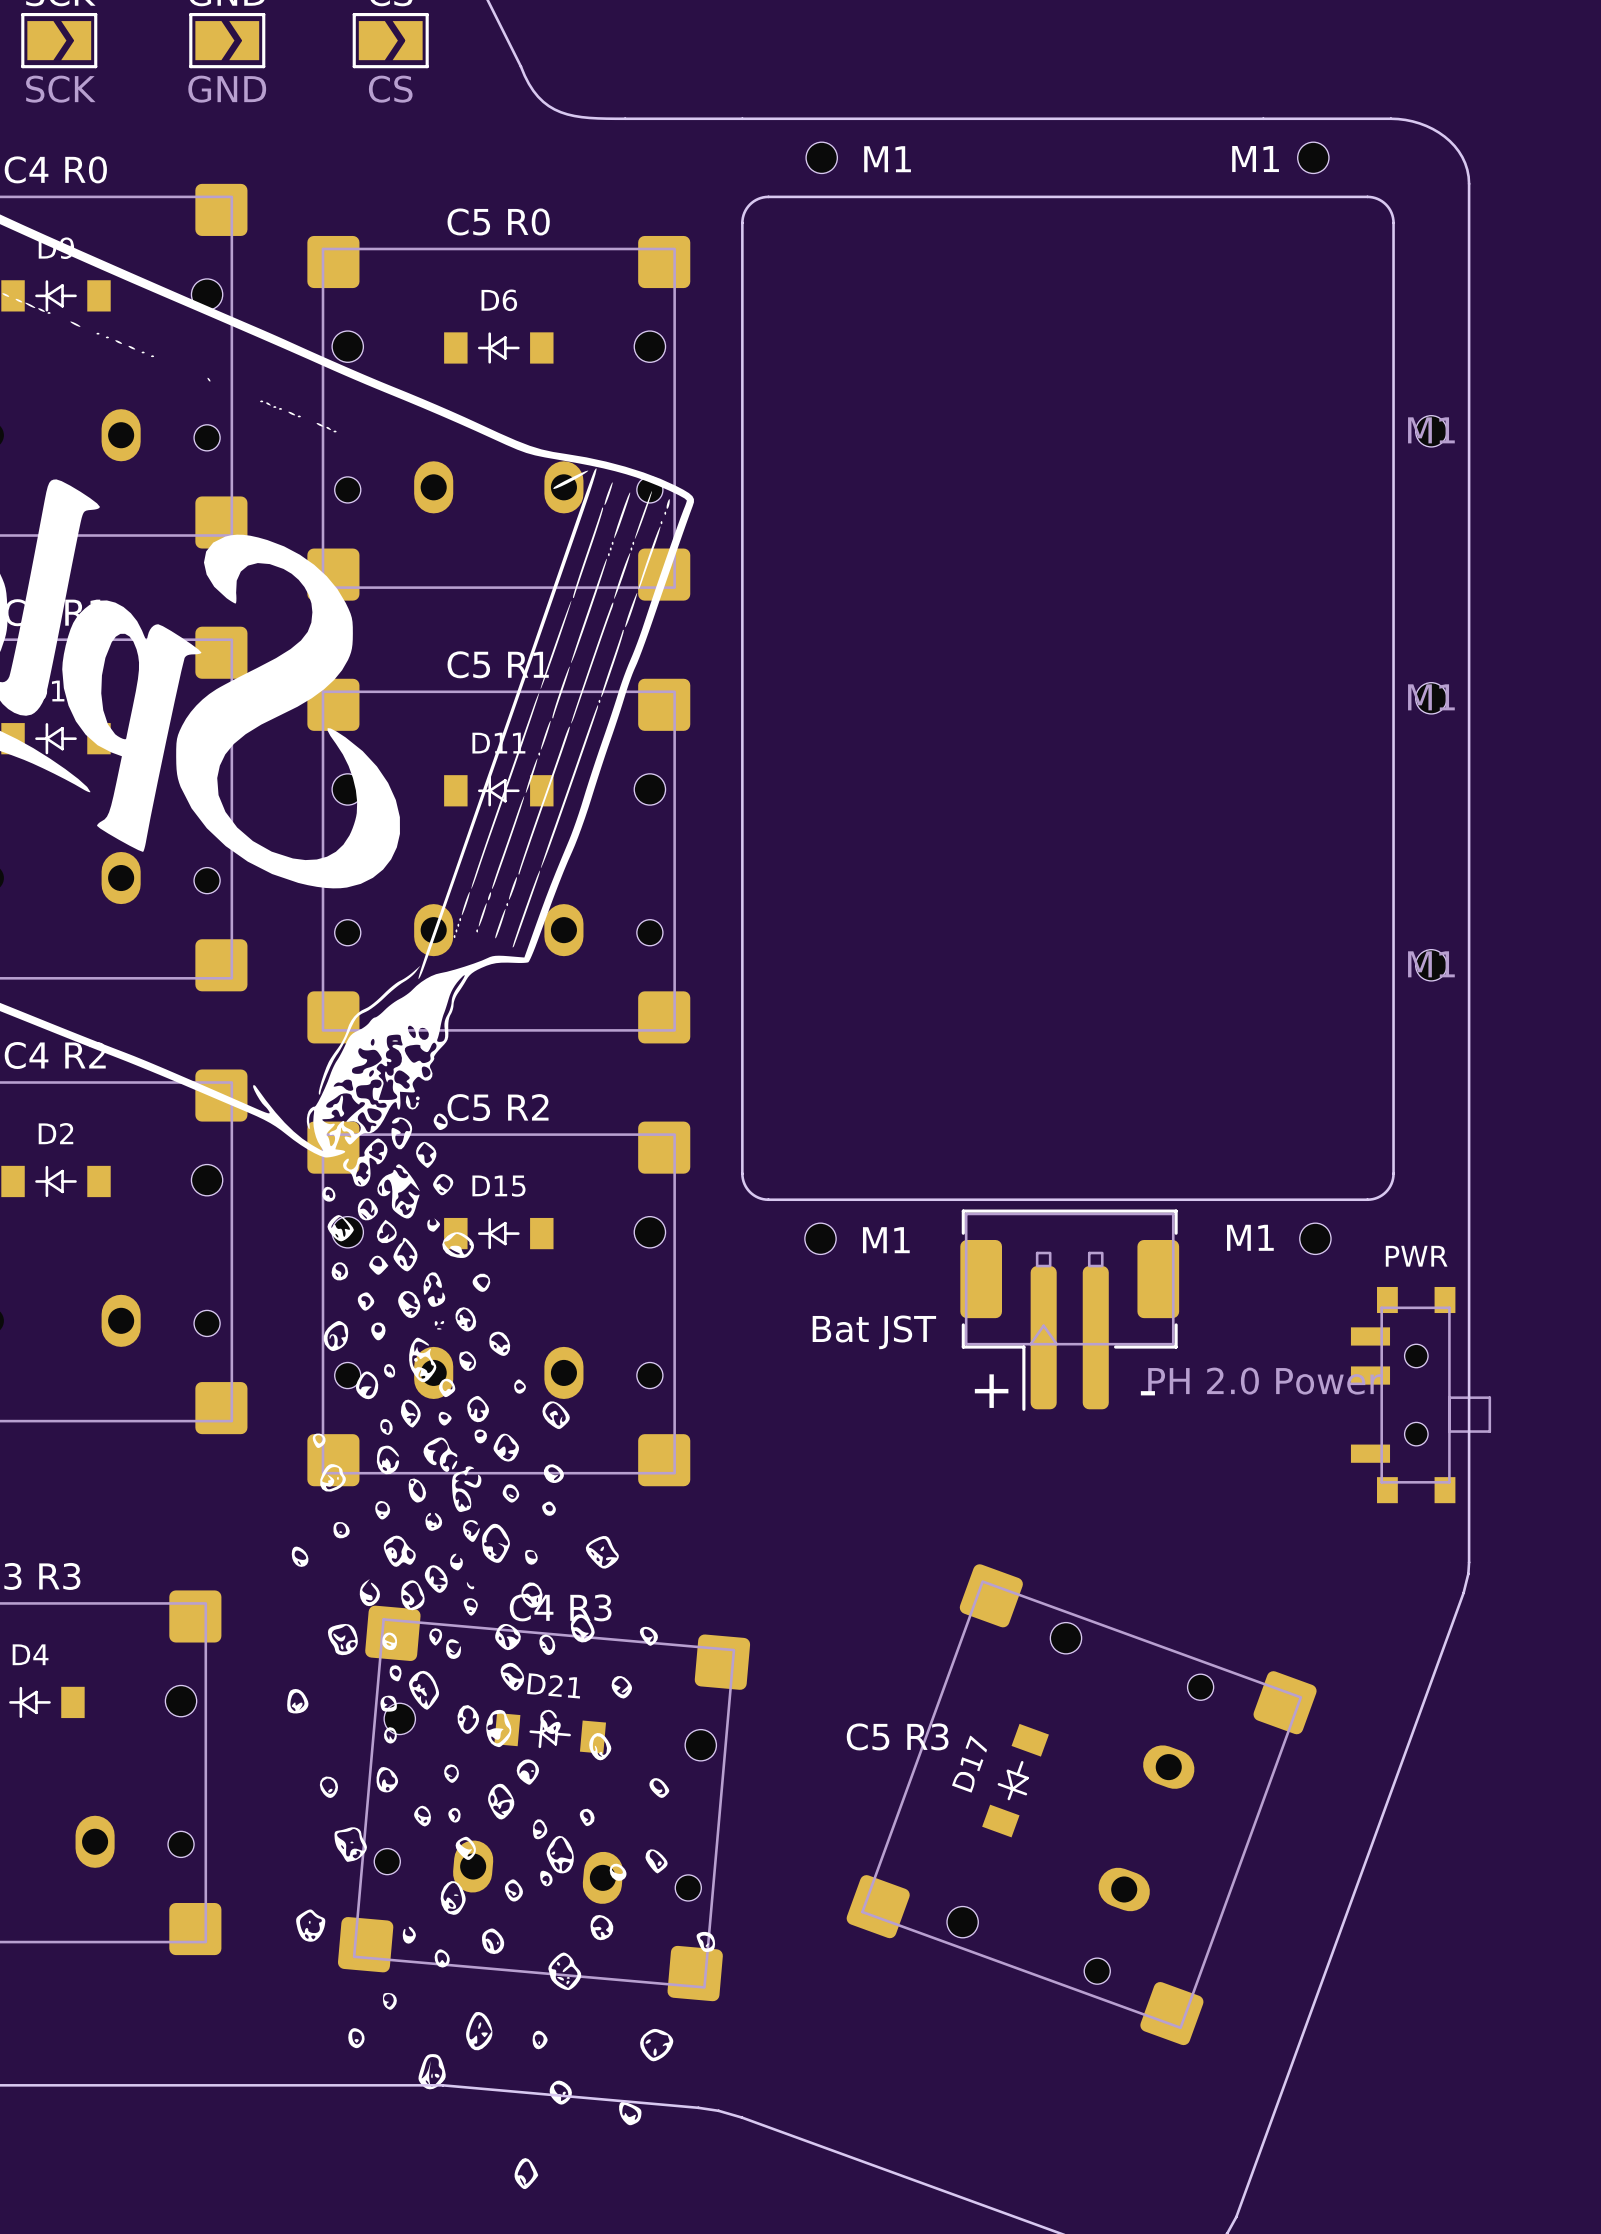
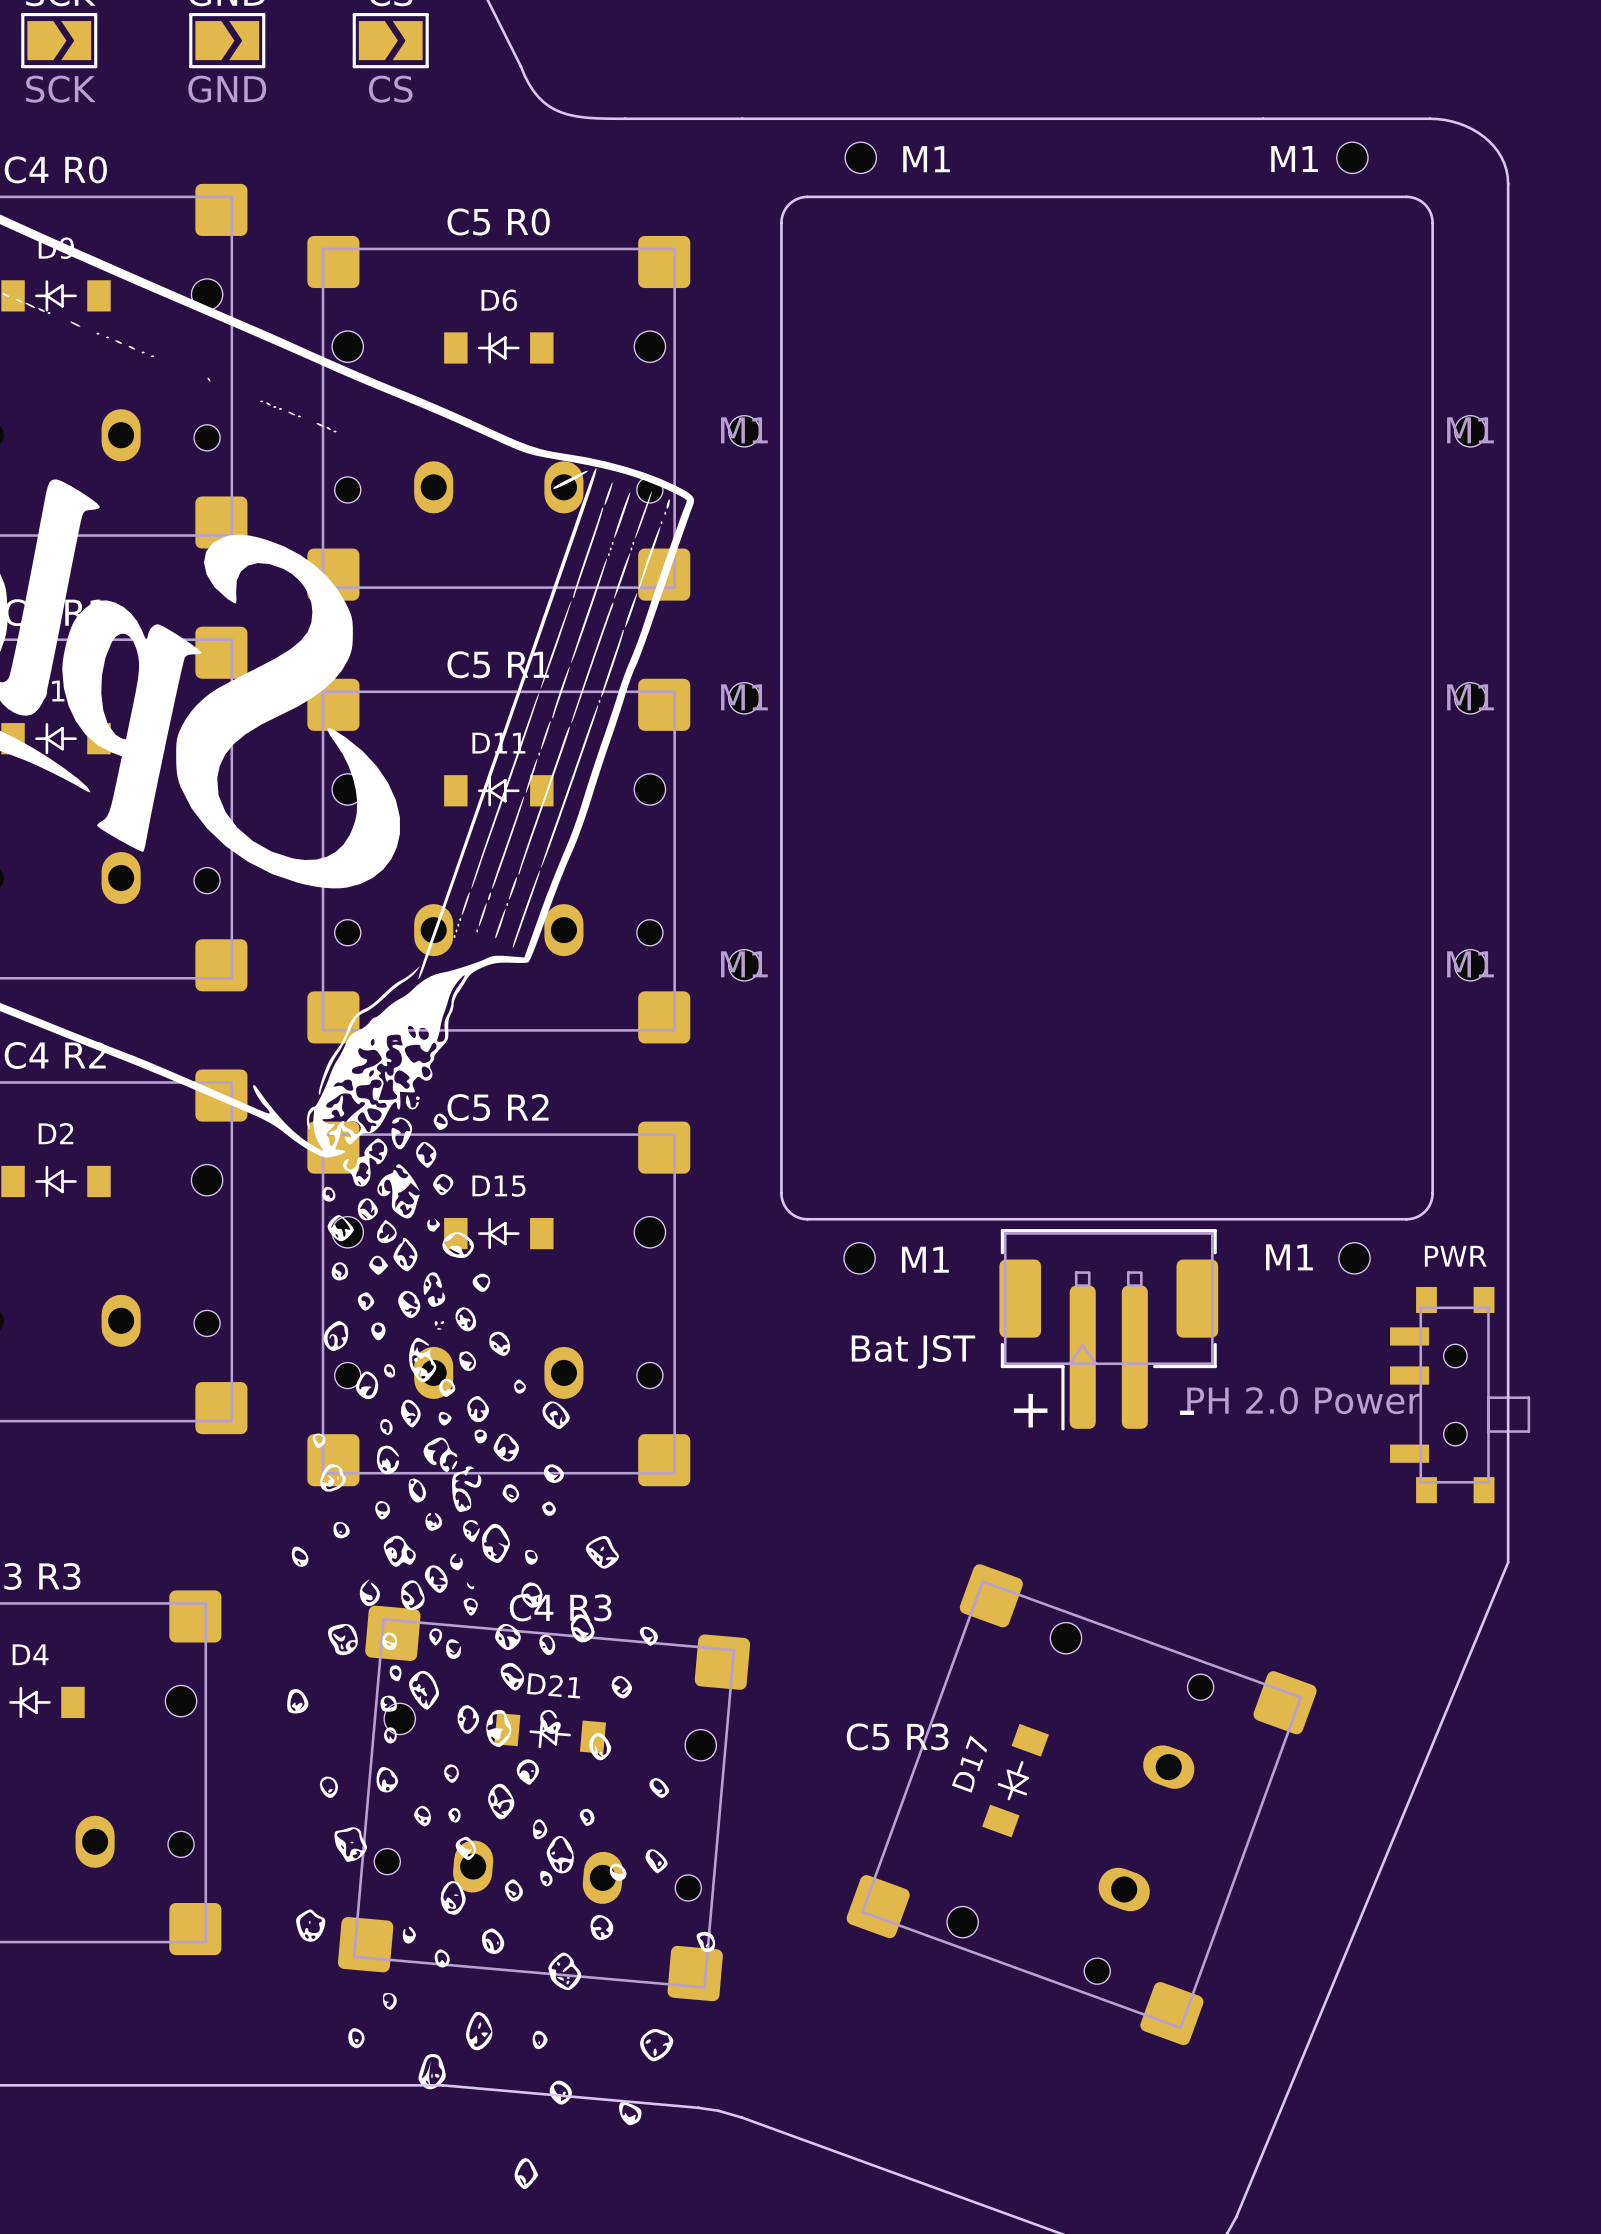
board edge: (1390, 118) (1419, 123) (1444, 136) (1462, 157) (1467, 169) (1469, 183) (1468, 1573) (1463, 1592) (1236, 2216) -> (1390, 118) (1444, 119) (1471, 129) (1488, 141) (1497, 151) (1504, 163) (1507, 176) (1508, 1562) (1236, 2216)
M1 position: (821, 157) -> (860, 157)
M1 position: (1313, 157) -> (1352, 157)
board edge: (807, 196) (768, 196) (758, 198) (746, 208) (742, 222) (742, 1173) (744, 1183) (749, 1192) (758, 1197) (768, 1199) (1367, 1199) (1379, 1196) (1390, 1186) (1393, 1173) (1393, 222) (1391, 212) (1385, 204) (1377, 198) (1367, 196) -> (807, 196) (797, 198) (789, 204) (783, 212) (781, 222) (781, 1193) (784, 1205) (795, 1216) (807, 1219) (1406, 1219) (1416, 1217) (1424, 1211) (1430, 1203) (1432, 1193) (1432, 222) (1428, 208) (1416, 198) (1406, 196) (1367, 196)
M1: none -> (744, 431)
M1 position: (1431, 431) -> (1470, 431)
M1: none -> (744, 698)
M1 position: (1431, 698) -> (1470, 698)
M1: none -> (744, 965)
M1 position: (1431, 965) -> (1470, 965)
M1 position: (820, 1238) -> (859, 1258)
M1 position: (1315, 1238) -> (1354, 1258)
Bat JST position: (1069, 1310) -> (1108, 1329)
text position: + (991, 1391) -> + (1030, 1410)
text position: - (1147, 1393) -> - (1186, 1412)
PWR position: (1421, 1395) -> (1460, 1395)

